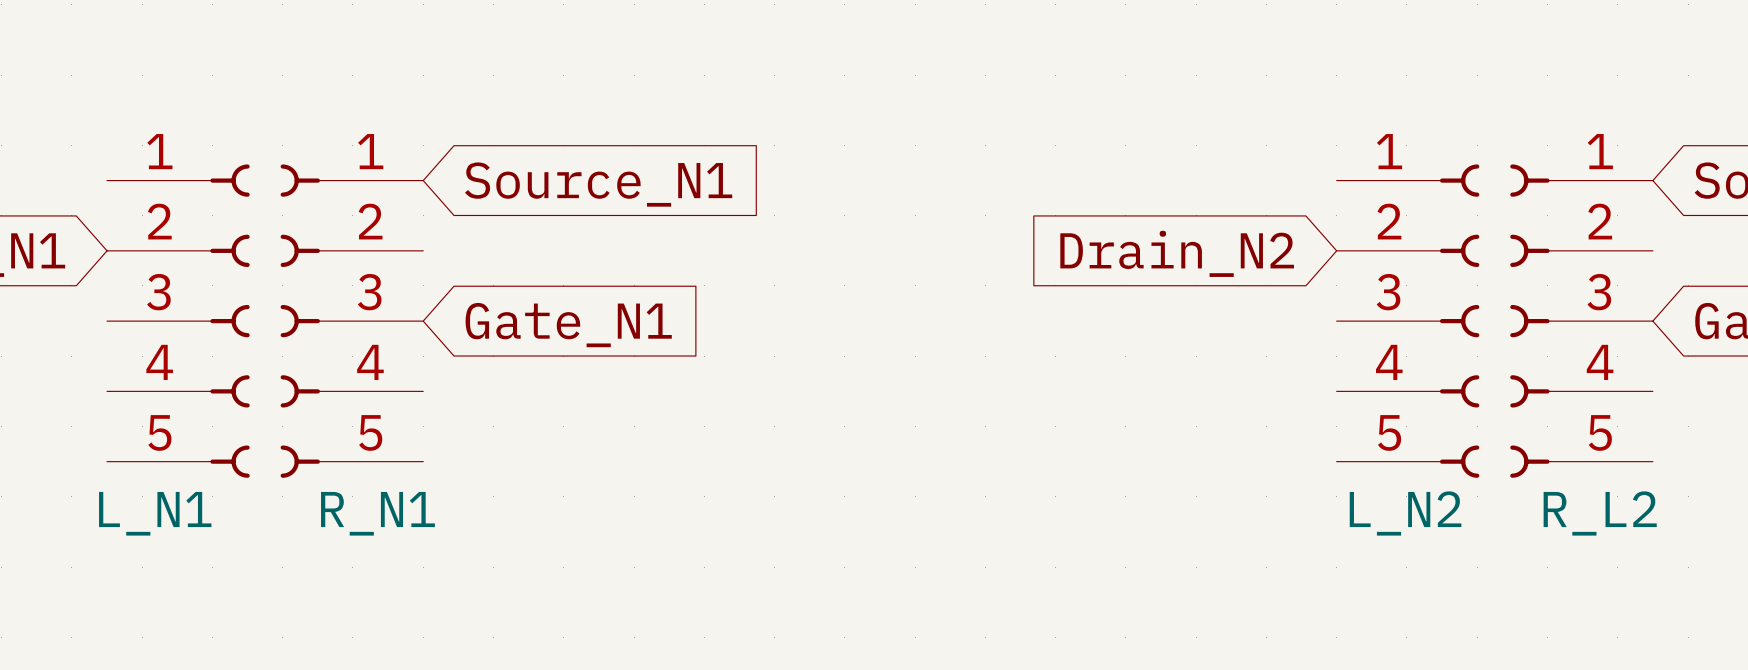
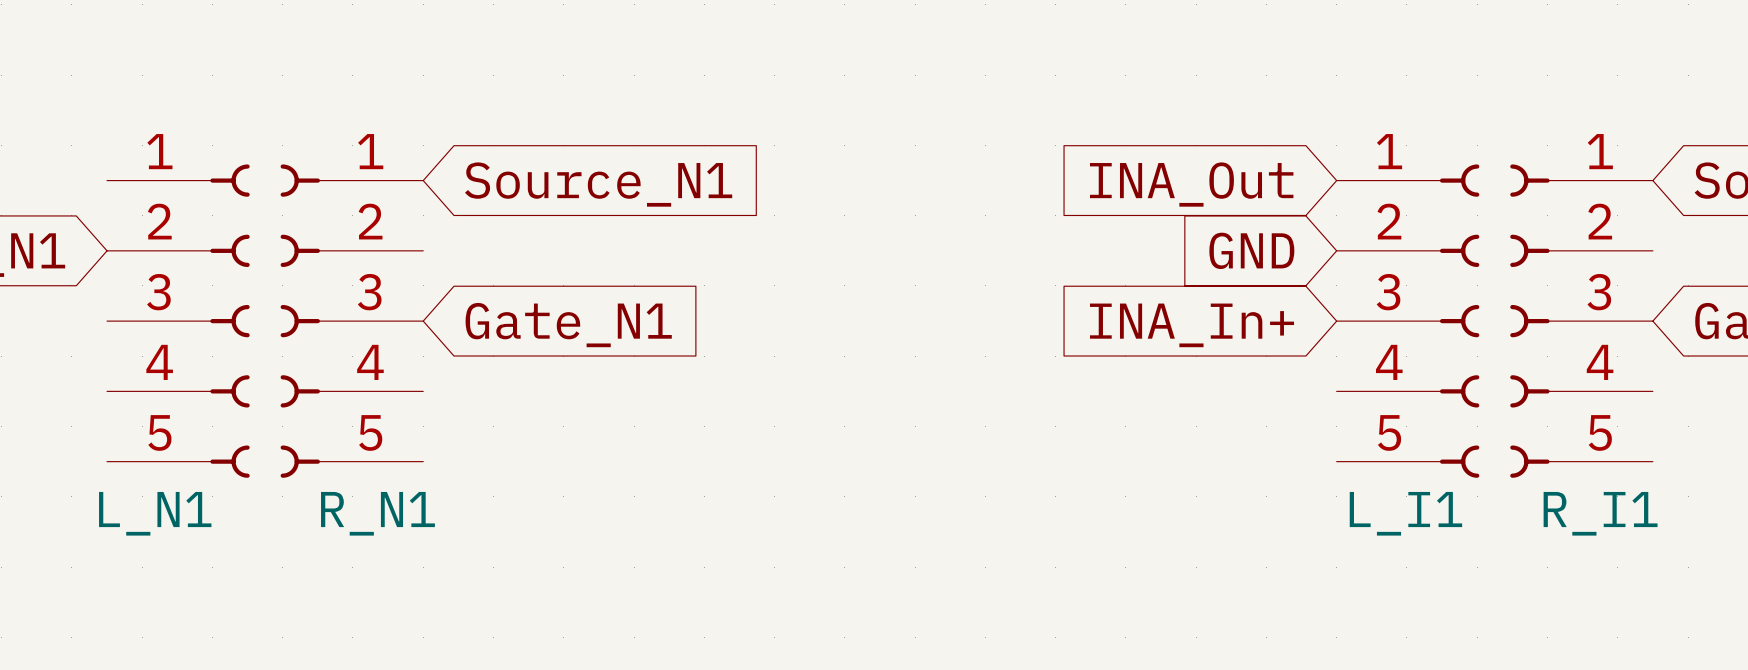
global label: none -> INA_Out (1191, 184)
global label: Drain_N2 (1177, 253) -> GND (1251, 250)
global label: none -> INA_In+ (1192, 325)
L_N2 name: L_N2 (1405, 513) -> L_I1 (1405, 513)
R_L2 name: R_L2 (1600, 513) -> R_I1 (1600, 513)

